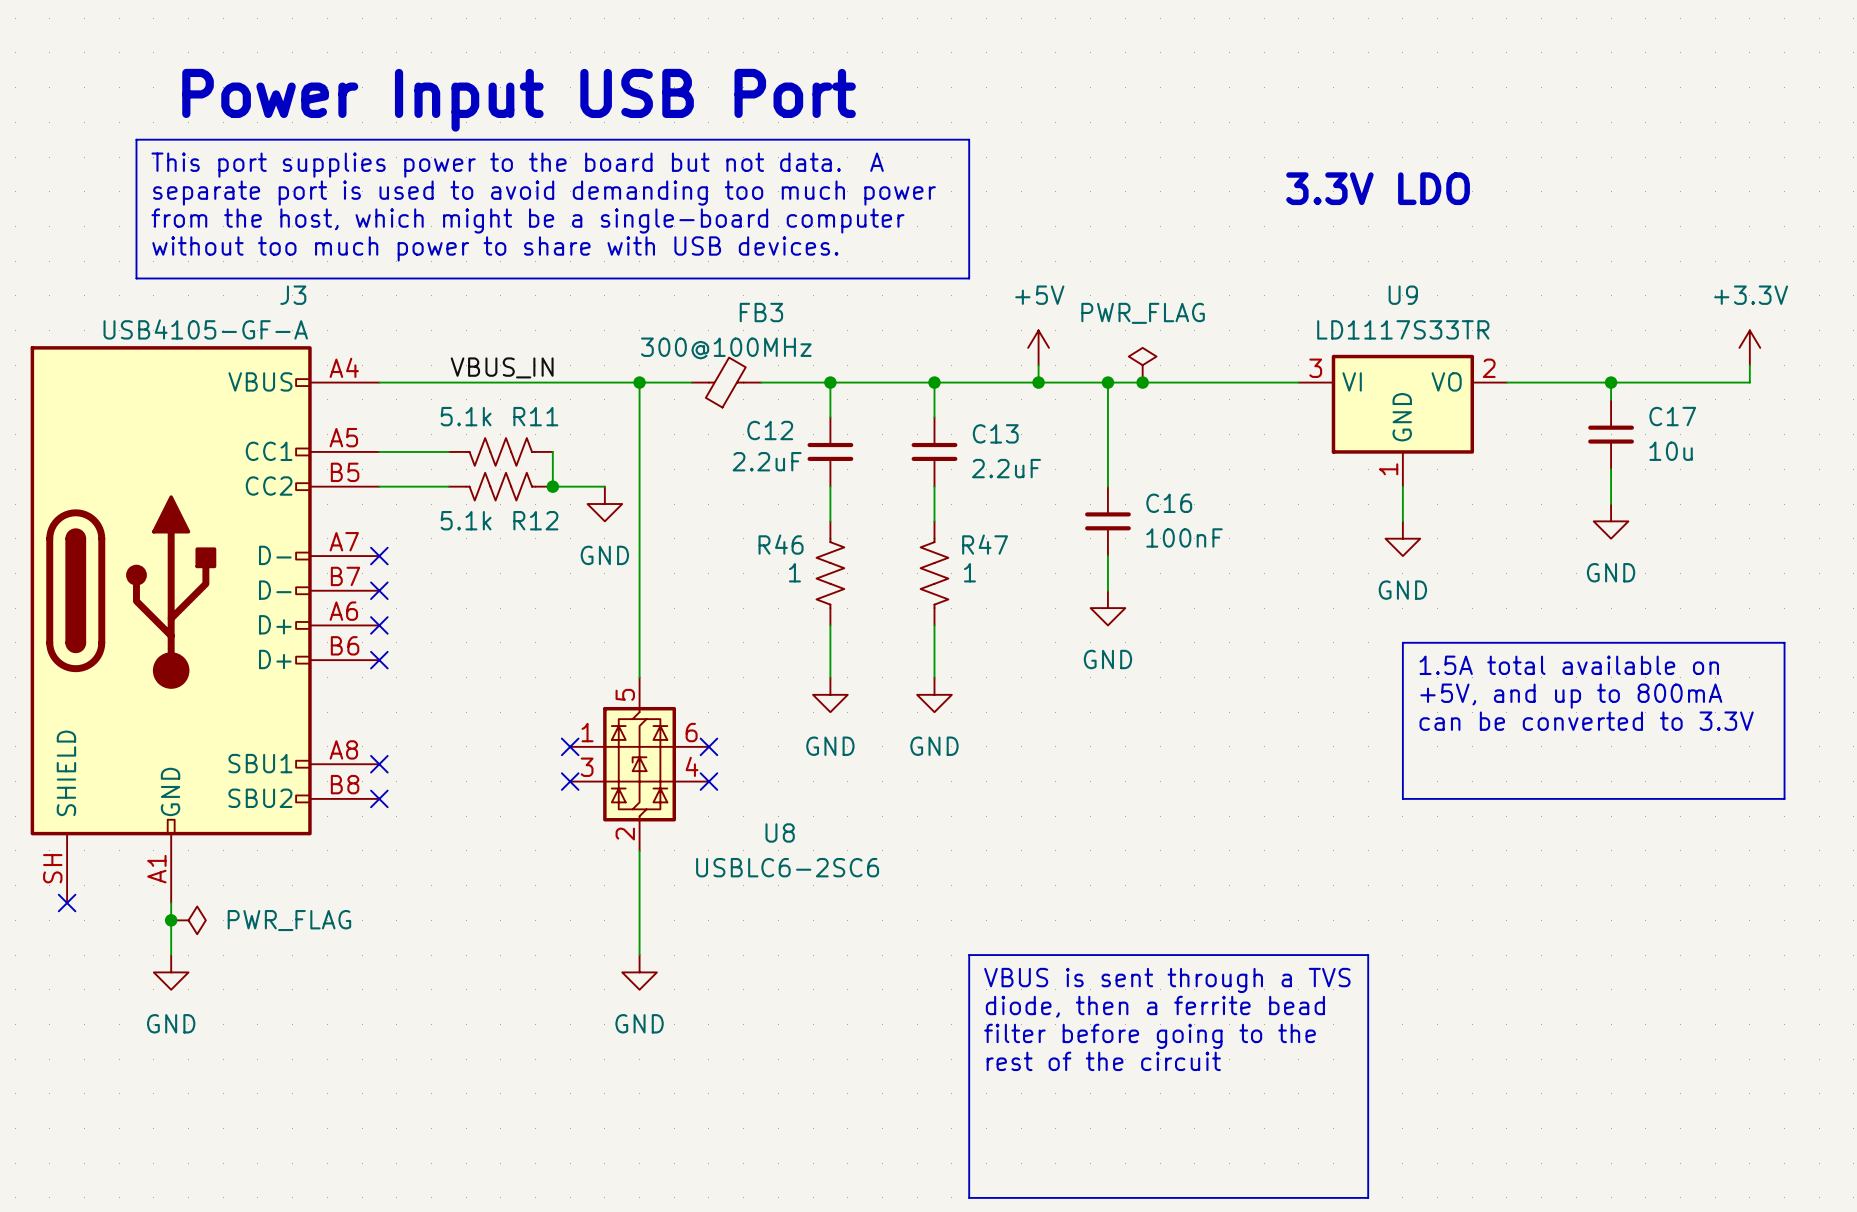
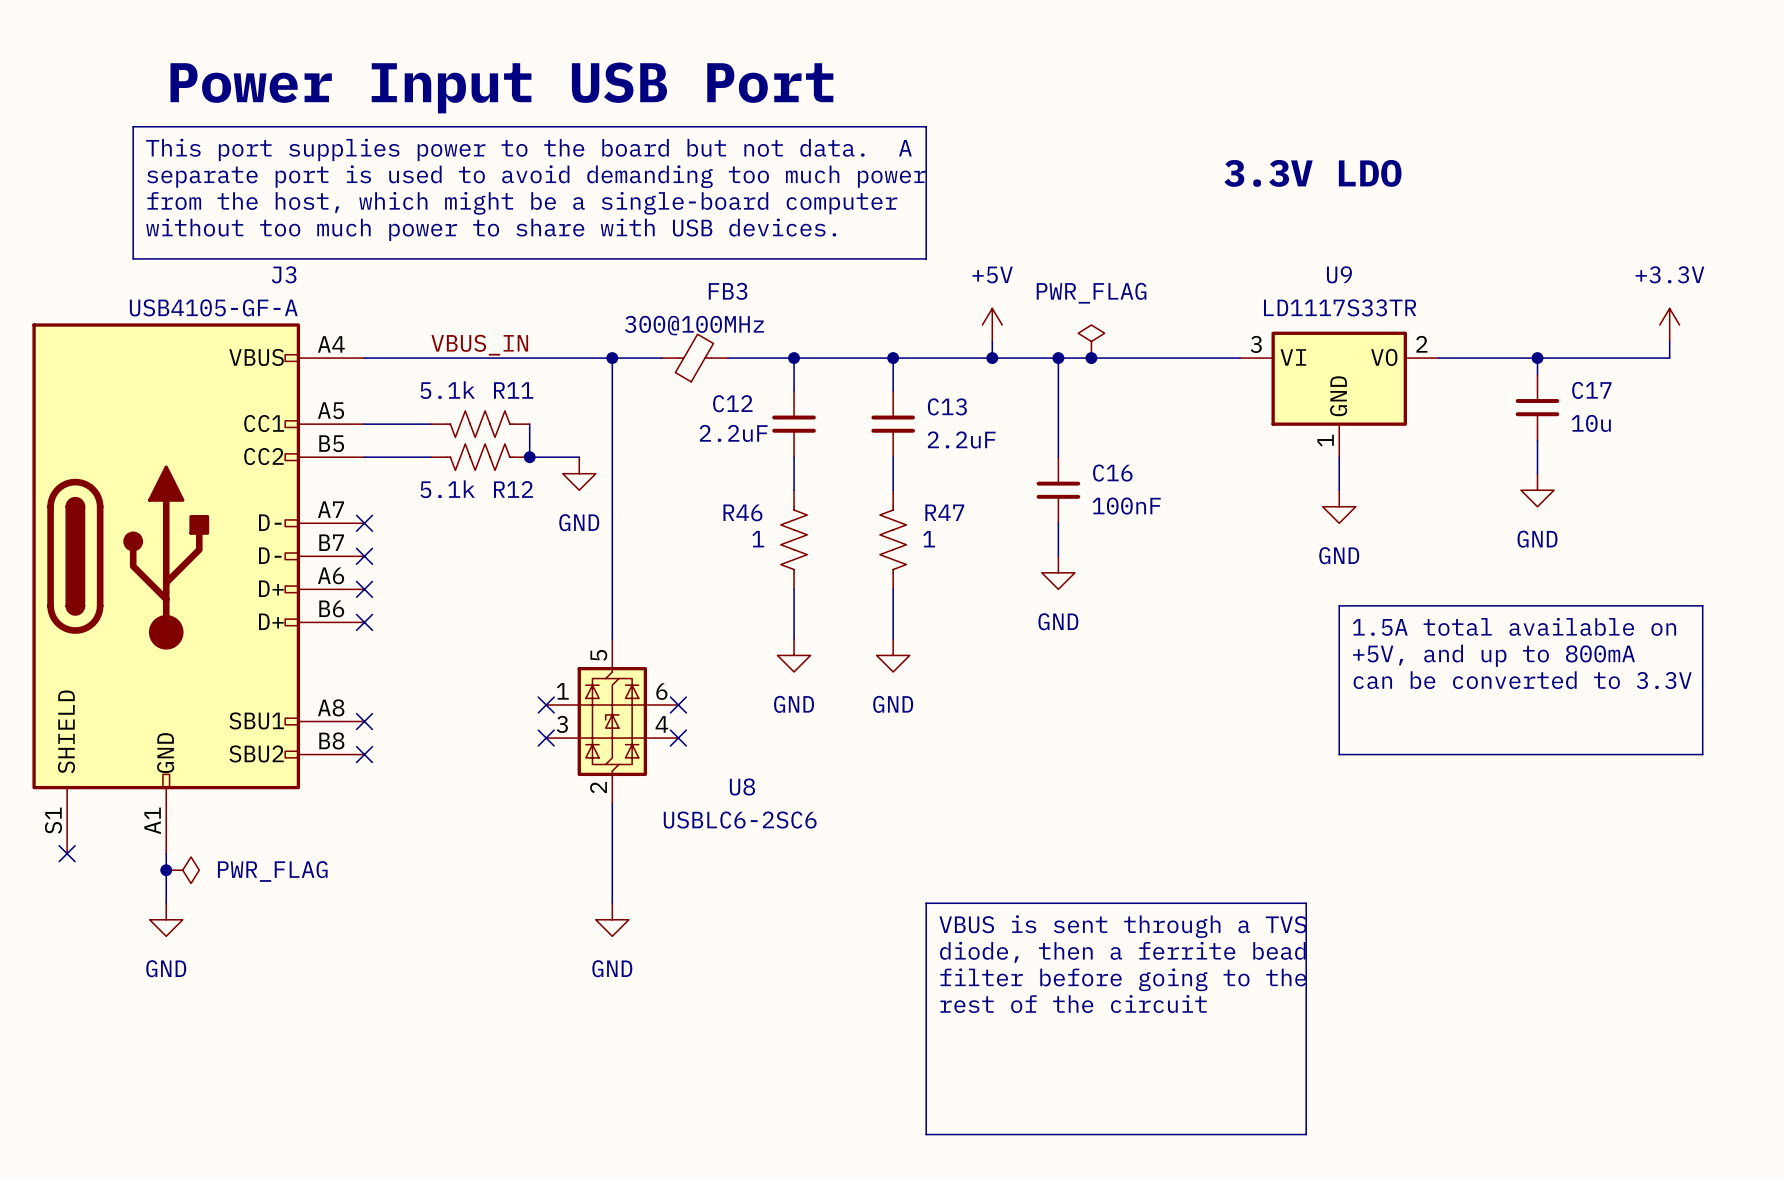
J3 pin number: SH (52, 868) -> S1 (53, 820)

